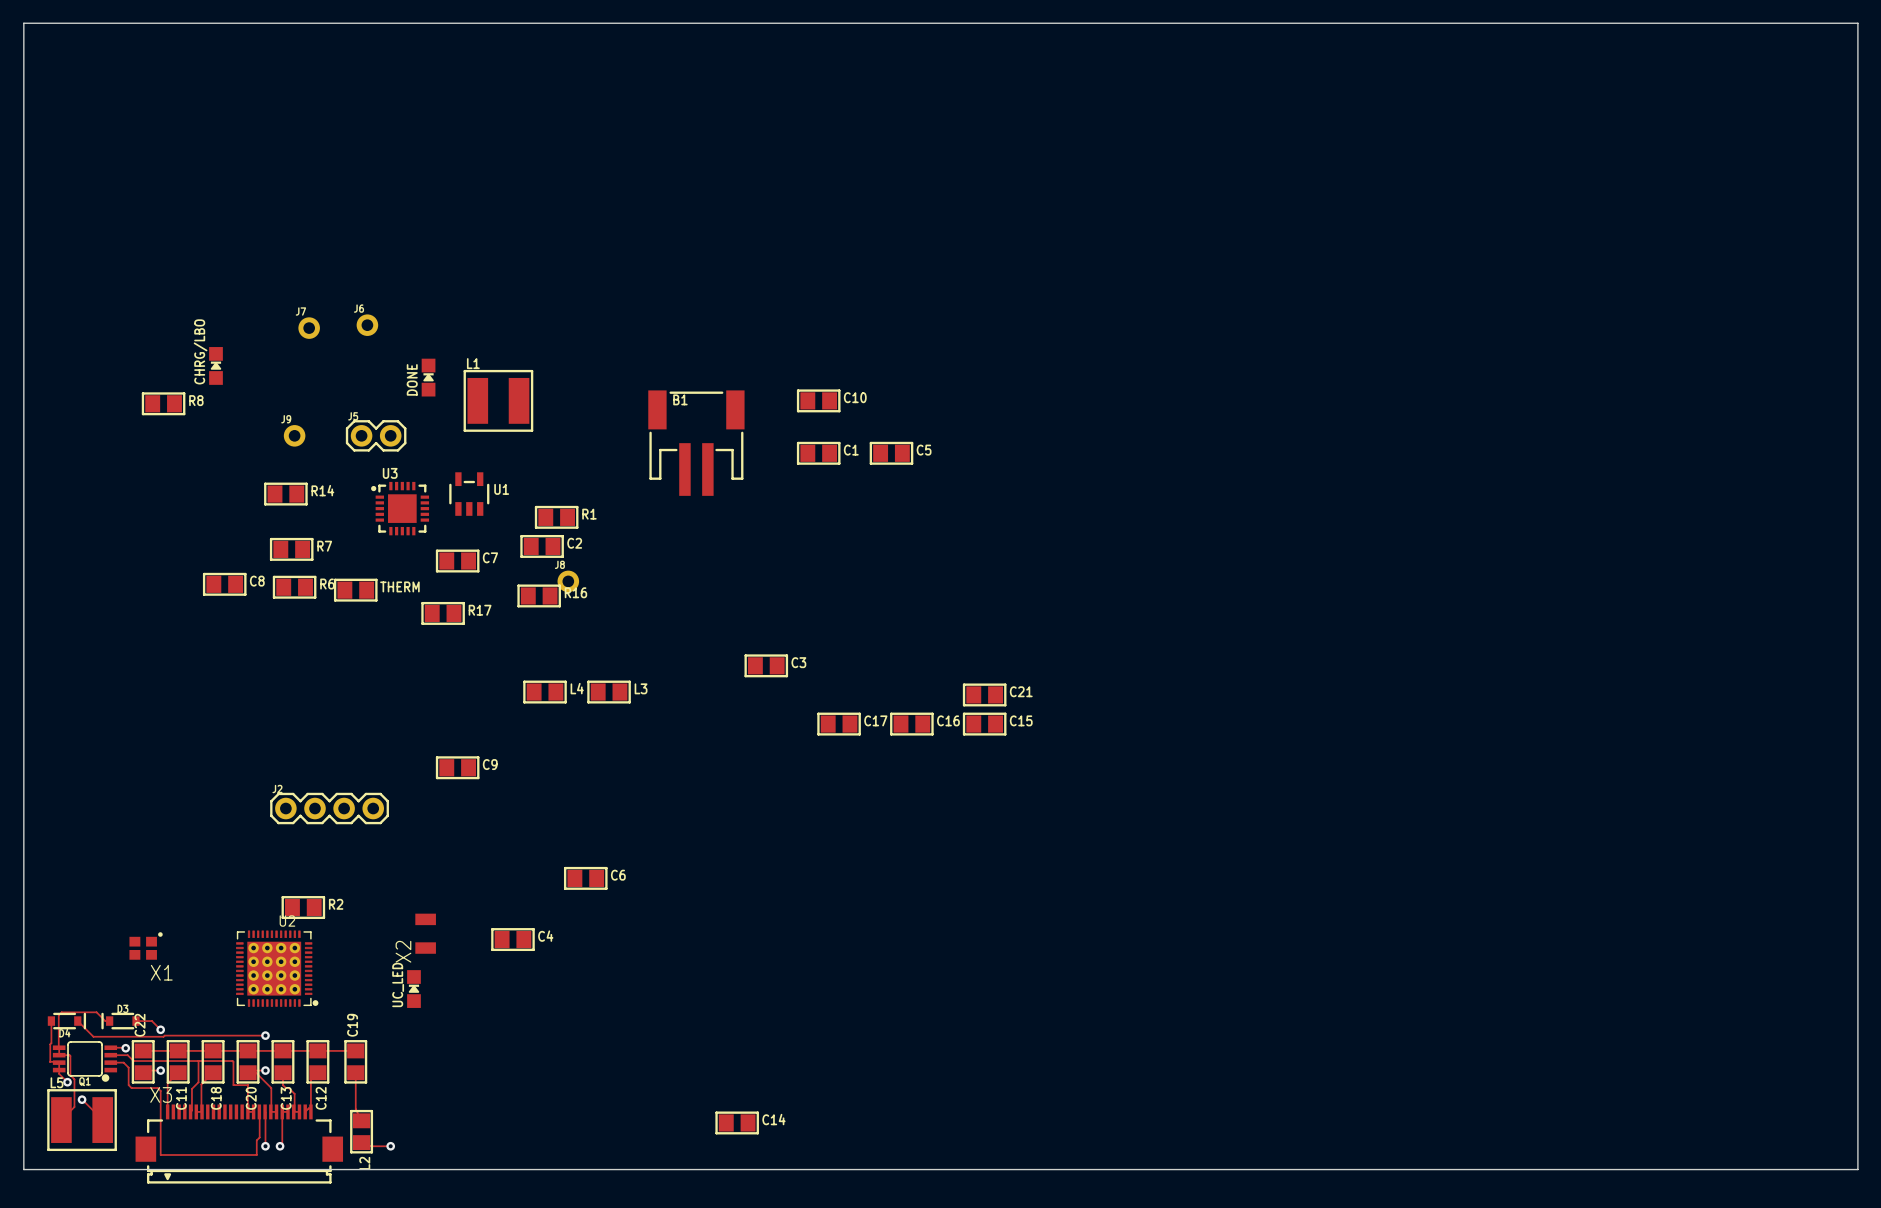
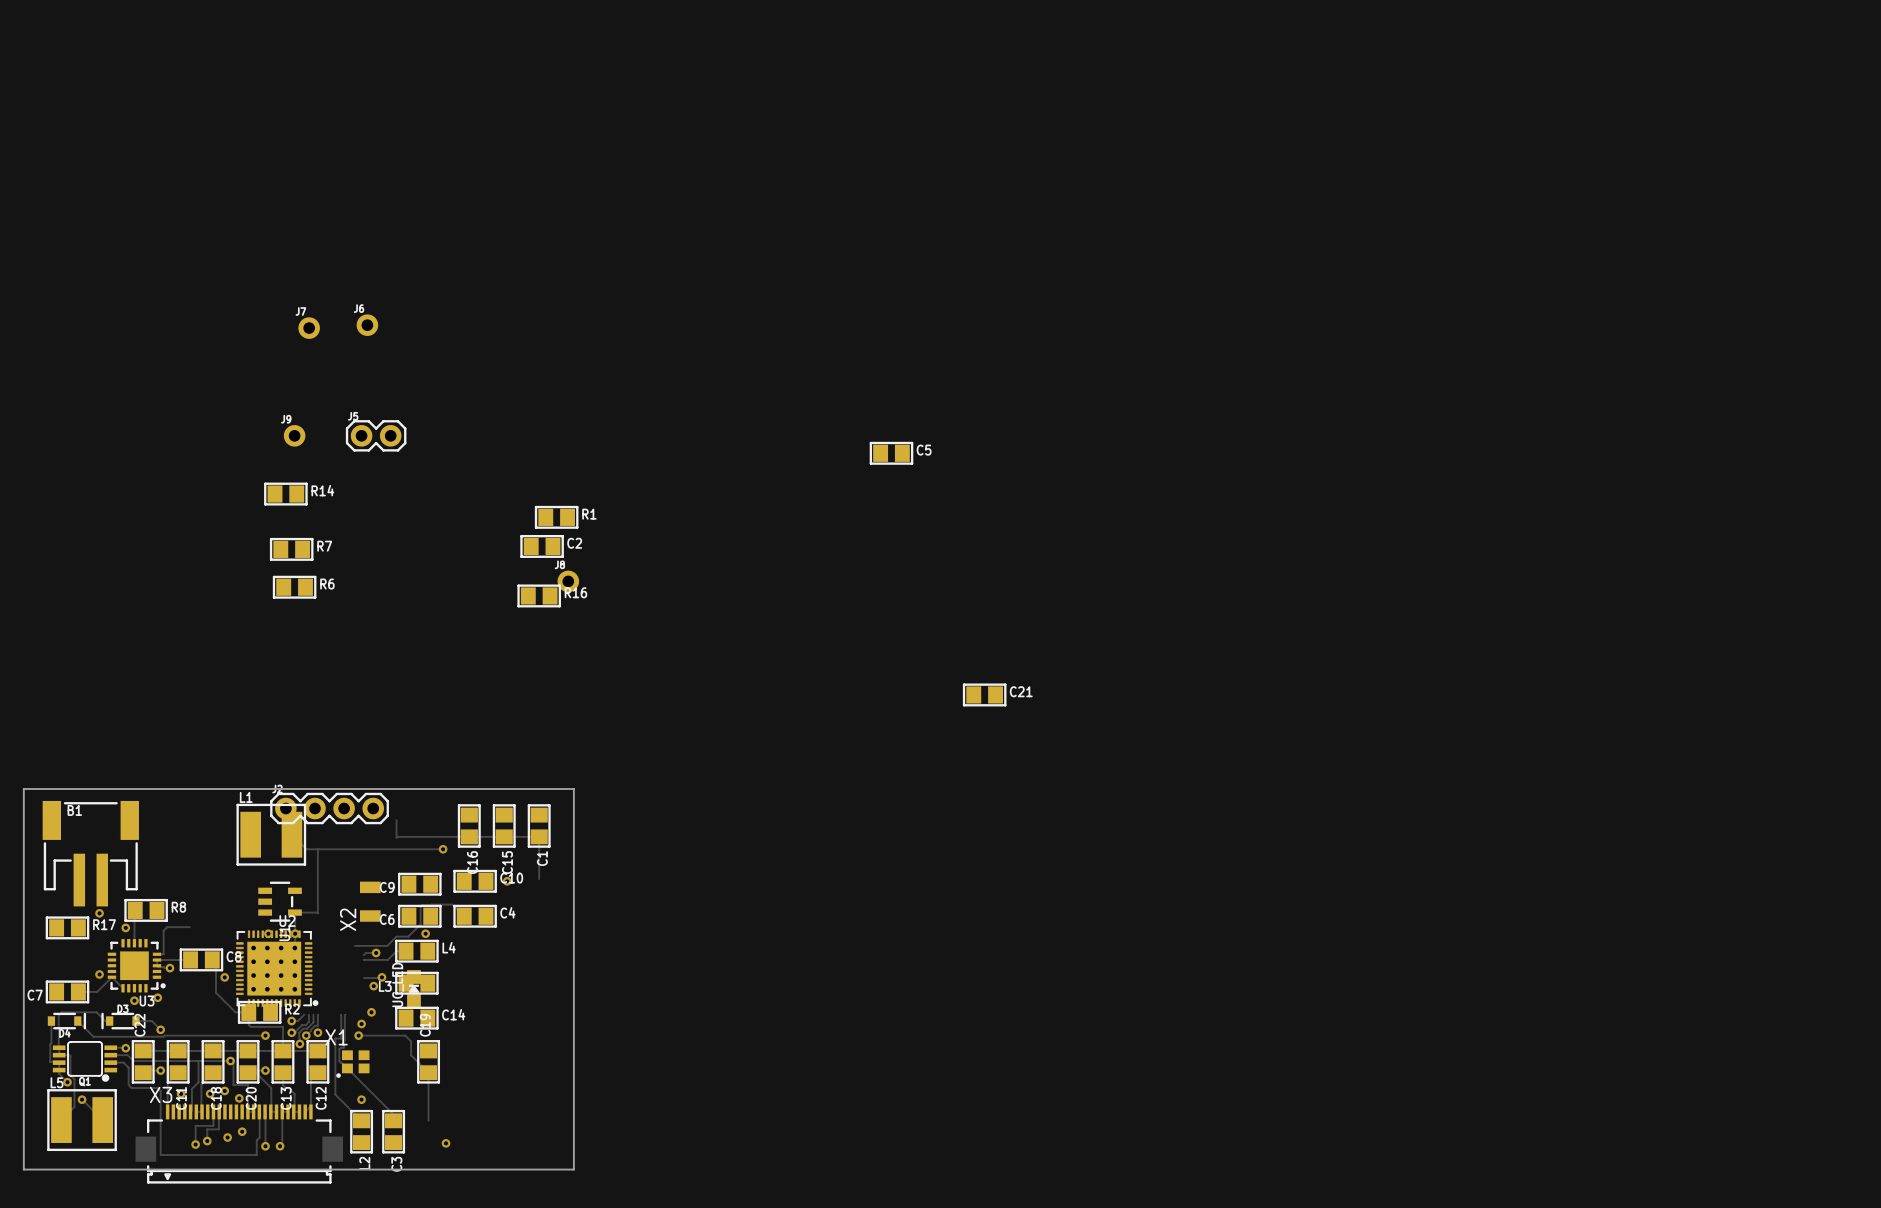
CHRG/LBO: (216, 365) -> none
DONE: (428, 377) -> none
L1 position: (498, 400) -> (271, 834)
C10 position: (818, 400) -> (475, 881)
R8 position: (163, 403) -> (146, 910)
B1 position: (696, 443) -> (90, 853)
C1 rotation: 0° (818, 453) -> 90° clockwise (539, 825)
C1 position: (818, 453) -> (539, 825)
U1 rotation: 0° (469, 494) -> 90° clockwise (280, 901)
U1 position: (469, 494) -> (280, 901)
U3 rotation: 0° (400, 508) -> 180° (136, 965)
U3 position: (400, 508) -> (136, 965)
C7 name position: C7 (490, 557) -> C7 (35, 995)
C7 position: (457, 561) -> (67, 991)
C8 position: (224, 584) -> (201, 959)
THERM: (355, 590) -> none
R17 position: (443, 613) -> (67, 927)
C3 rotation: 0° (766, 665) -> 90° clockwise (393, 1131)
C3 position: (766, 665) -> (393, 1131)
L3 name position: L3 (641, 688) -> L3 (385, 986)
L4 position: (545, 692) -> (416, 951)
L3 position: (609, 692) -> (416, 983)
C17: (839, 724) -> none
C16 rotation: 0° (911, 724) -> 90° clockwise (469, 825)
C16 position: (911, 724) -> (469, 825)
C15 rotation: 0° (984, 724) -> 90° clockwise (504, 825)
C15 position: (984, 724) -> (504, 825)
C9 name position: C9 (490, 764) -> C9 (387, 887)
C9 position: (457, 767) -> (419, 884)
board edge: (23, 789) (23, 23) (1857, 23) (1857, 1169) (573, 1169) -> (23, 789) (573, 789) (573, 1169)
track: none -> (396, 820) (396, 837) (539, 836) (539, 879)
track: none -> (291, 834) (306, 849) (443, 849)
track: none -> (317, 849) (317, 913) (294, 912) (295, 955)
via: none -> (443, 849)
C6 name position: C6 (618, 875) -> C6 (387, 919)
C6 position: (585, 878) -> (419, 916)
via: none -> (507, 881)
R2 position: (303, 907) -> (259, 1012)
track: none -> (135, 910) (134, 943)
via: none -> (99, 913)
track: none -> (464, 916) (452, 904) (422, 905) (420, 924) (408, 936) (396, 936) (387, 945) (354, 945)
via: none -> (125, 927)
track: none -> (189, 927) (167, 927) (163, 930) (163, 954) (157, 954)
via: none -> (268, 933)
via: none -> (295, 933)
X2 position: (425, 933) -> (370, 901)
via: none -> (425, 933)
C4 position: (512, 939) -> (475, 916)
X1 rotation: 0° (146, 945) -> 180° (352, 1064)
X1 position: (146, 945) -> (352, 1064)
track: none -> (406, 951) (396, 951) (387, 959) (363, 959)
track: none -> (376, 952) (366, 952) (363, 955)
via: none -> (376, 952)
track: none -> (212, 959) (216, 963) (216, 992) (235, 1012) (248, 1012) (248, 1024) (250, 1026) (282, 1026) (282, 1050)
track: none -> (190, 960) (157, 960) (158, 967) (169, 968)
via: none -> (169, 968)
via: none -> (99, 974)
via: none -> (224, 977)
track: none -> (381, 977) (363, 978)
via: none -> (381, 977)
via: none -> (373, 986)
track: none -> (123, 988) (111, 977) (97, 991) (78, 991)
via: none -> (157, 997)
via: none -> (134, 1000)
via: none -> (371, 1012)
track: none -> (304, 1014) (297, 1021) (291, 1021)
track: none -> (308, 1014) (308, 1021) (305, 1025) (301, 1025) (295, 1032) (291, 1032)
track: none -> (313, 1014) (313, 1022) (307, 1028)
track: none -> (318, 1014) (317, 1025) (315, 1025) (306, 1035)
track: none -> (345, 1014) (344, 1047) (339, 1049) (339, 1061) (393, 1114) (393, 1120)
via: none -> (291, 1021)
via: none -> (361, 1023)
track: none -> (307, 1028) (303, 1028) (299, 1032) (299, 1043)
via: none -> (291, 1032)
via: none -> (317, 1032)
via: none -> (306, 1035)
track: none -> (358, 1035) (405, 1035) (411, 1041) (411, 1055) (428, 1072) (428, 1120)
via: none -> (358, 1035)
via: none -> (299, 1043)
track: (317, 1050) (355, 1050) -> none
via: none -> (230, 1061)
C19 position: (355, 1061) -> (428, 1061)
track: (355, 1072) (355, 1109) (361, 1120) -> (341, 1014) (341, 1038) (335, 1038) (335, 1094) (361, 1120)
via: none -> (224, 1090)
via: none -> (181, 1093)
via: none -> (210, 1093)
via: none -> (239, 1098)
via: none -> (361, 1099)
track: none -> (213, 1111) (213, 1125) (195, 1125) (195, 1144)
track: none -> (219, 1111) (218, 1128) (207, 1129) (207, 1141)
C14 position: (737, 1122) -> (416, 1018)
via: none -> (242, 1131)
via: none -> (227, 1137)
via: none -> (207, 1141)
track: (361, 1142) (371, 1146) (390, 1146) -> none
via: none -> (446, 1143)
via: none -> (195, 1144)
via: (390, 1146) -> none

